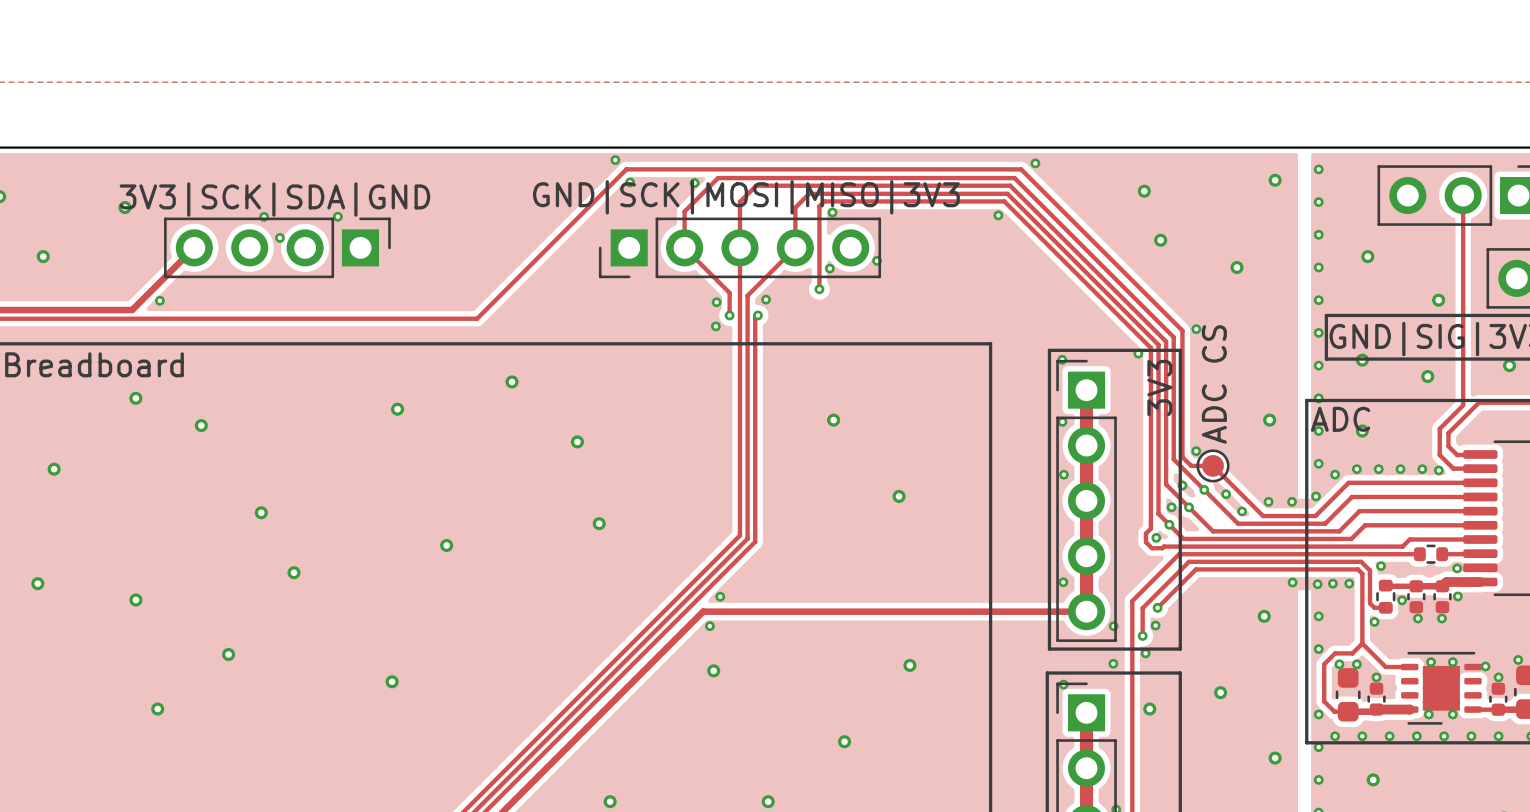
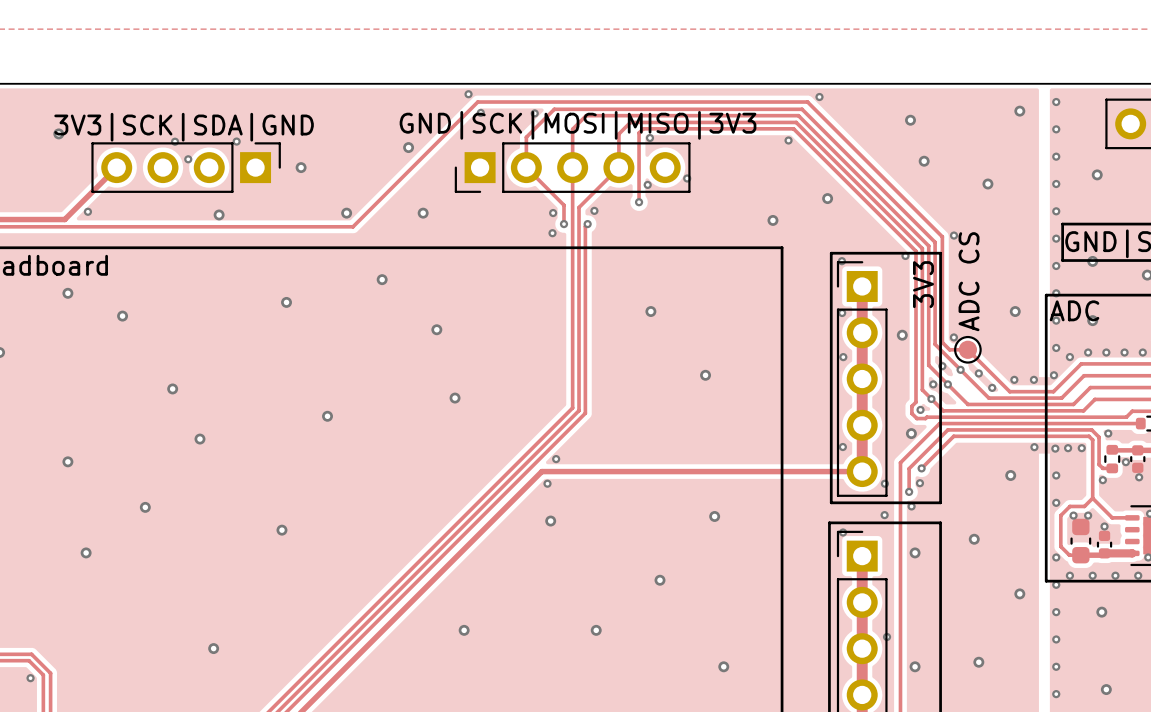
via: none -> (408, 147)
via: none -> (301, 167)
via: none -> (827, 198)
via: none -> (346, 213)
via: none -> (423, 213)
via: none -> (219, 214)
via: none -> (772, 220)
via: none -> (902, 335)
via: none -> (911, 433)

